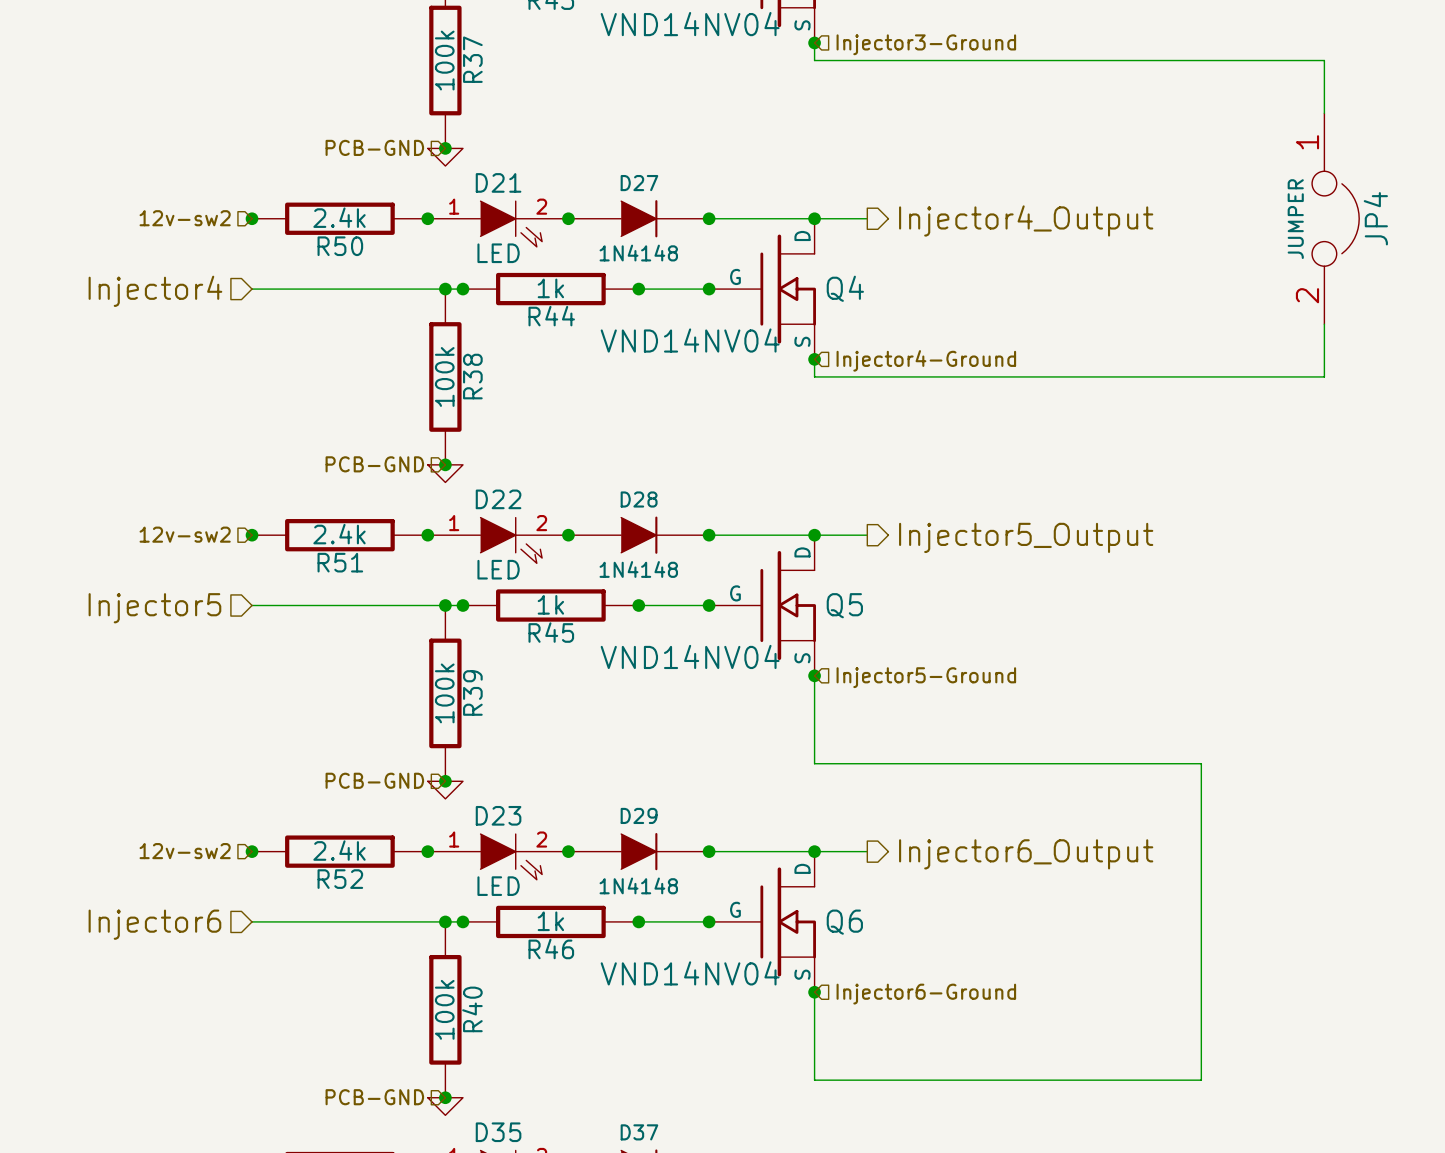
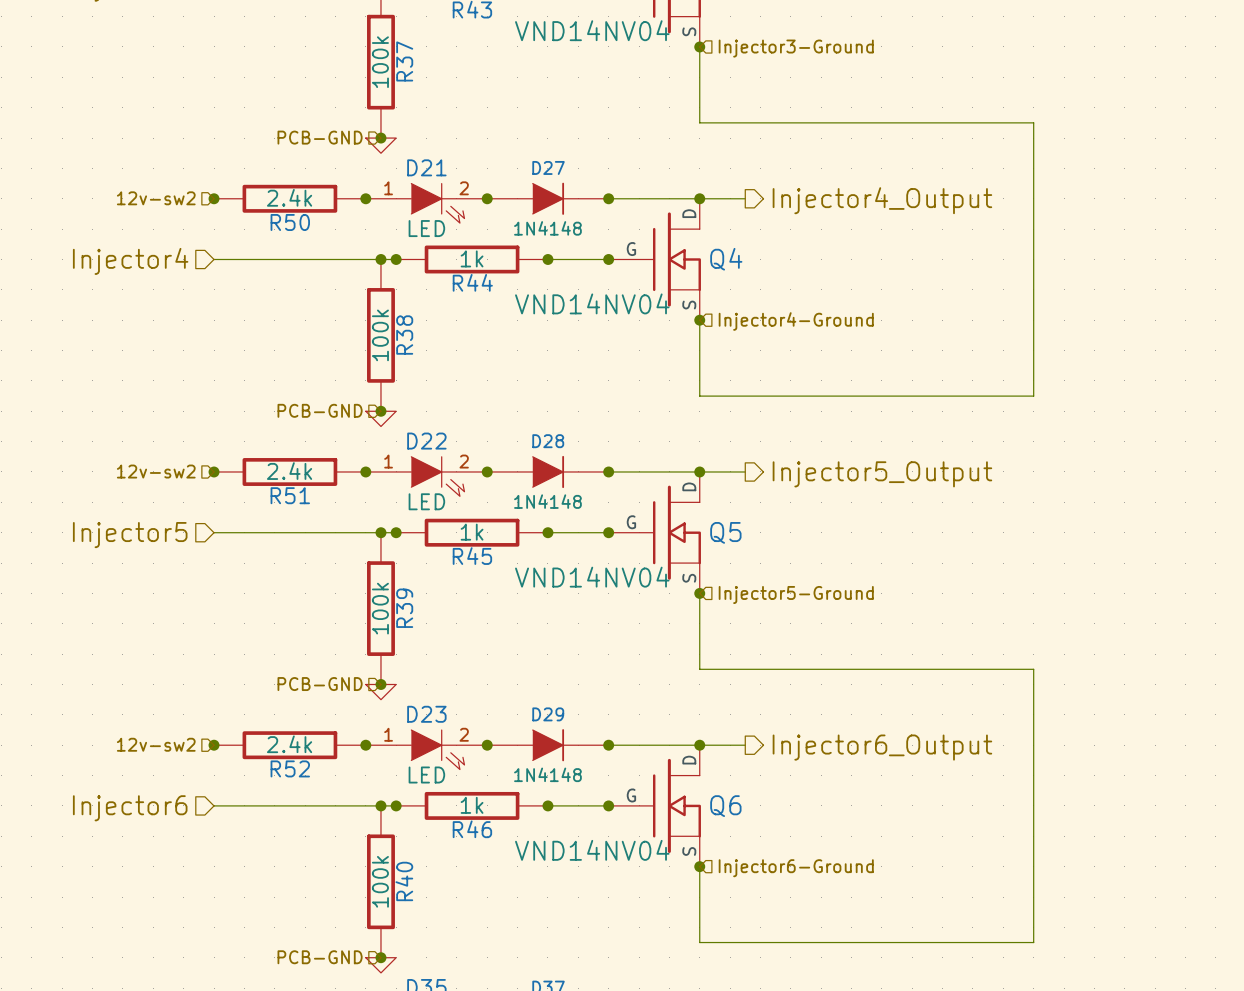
wire: (814, 60) (1324, 60) (1324, 113) -> none
JP4: JUMPER (1335, 218) -> none
wire: (1324, 324) (1324, 376) (814, 376) -> (699, 62) (699, 122) (1033, 122) (1033, 396) (699, 396) (699, 335)

